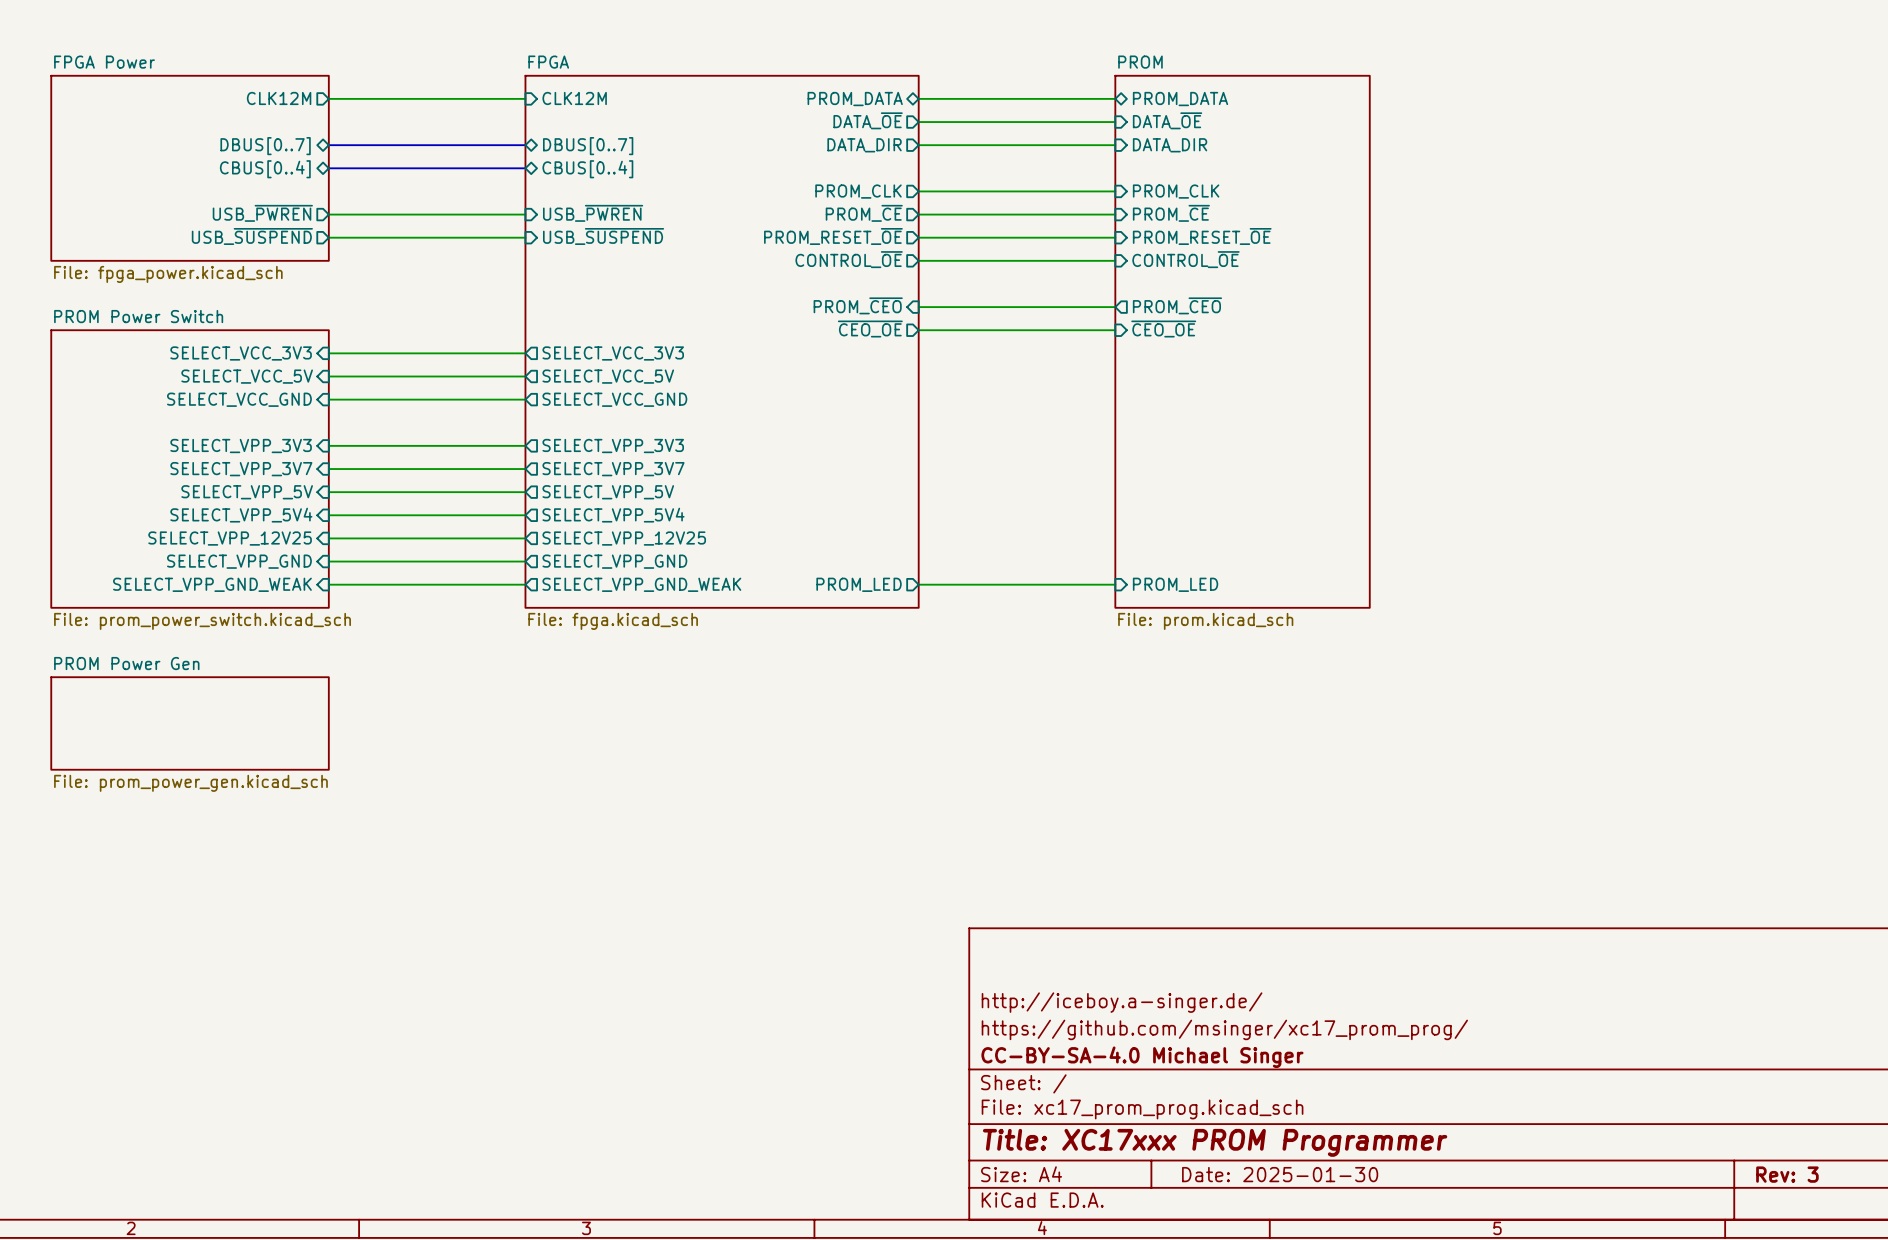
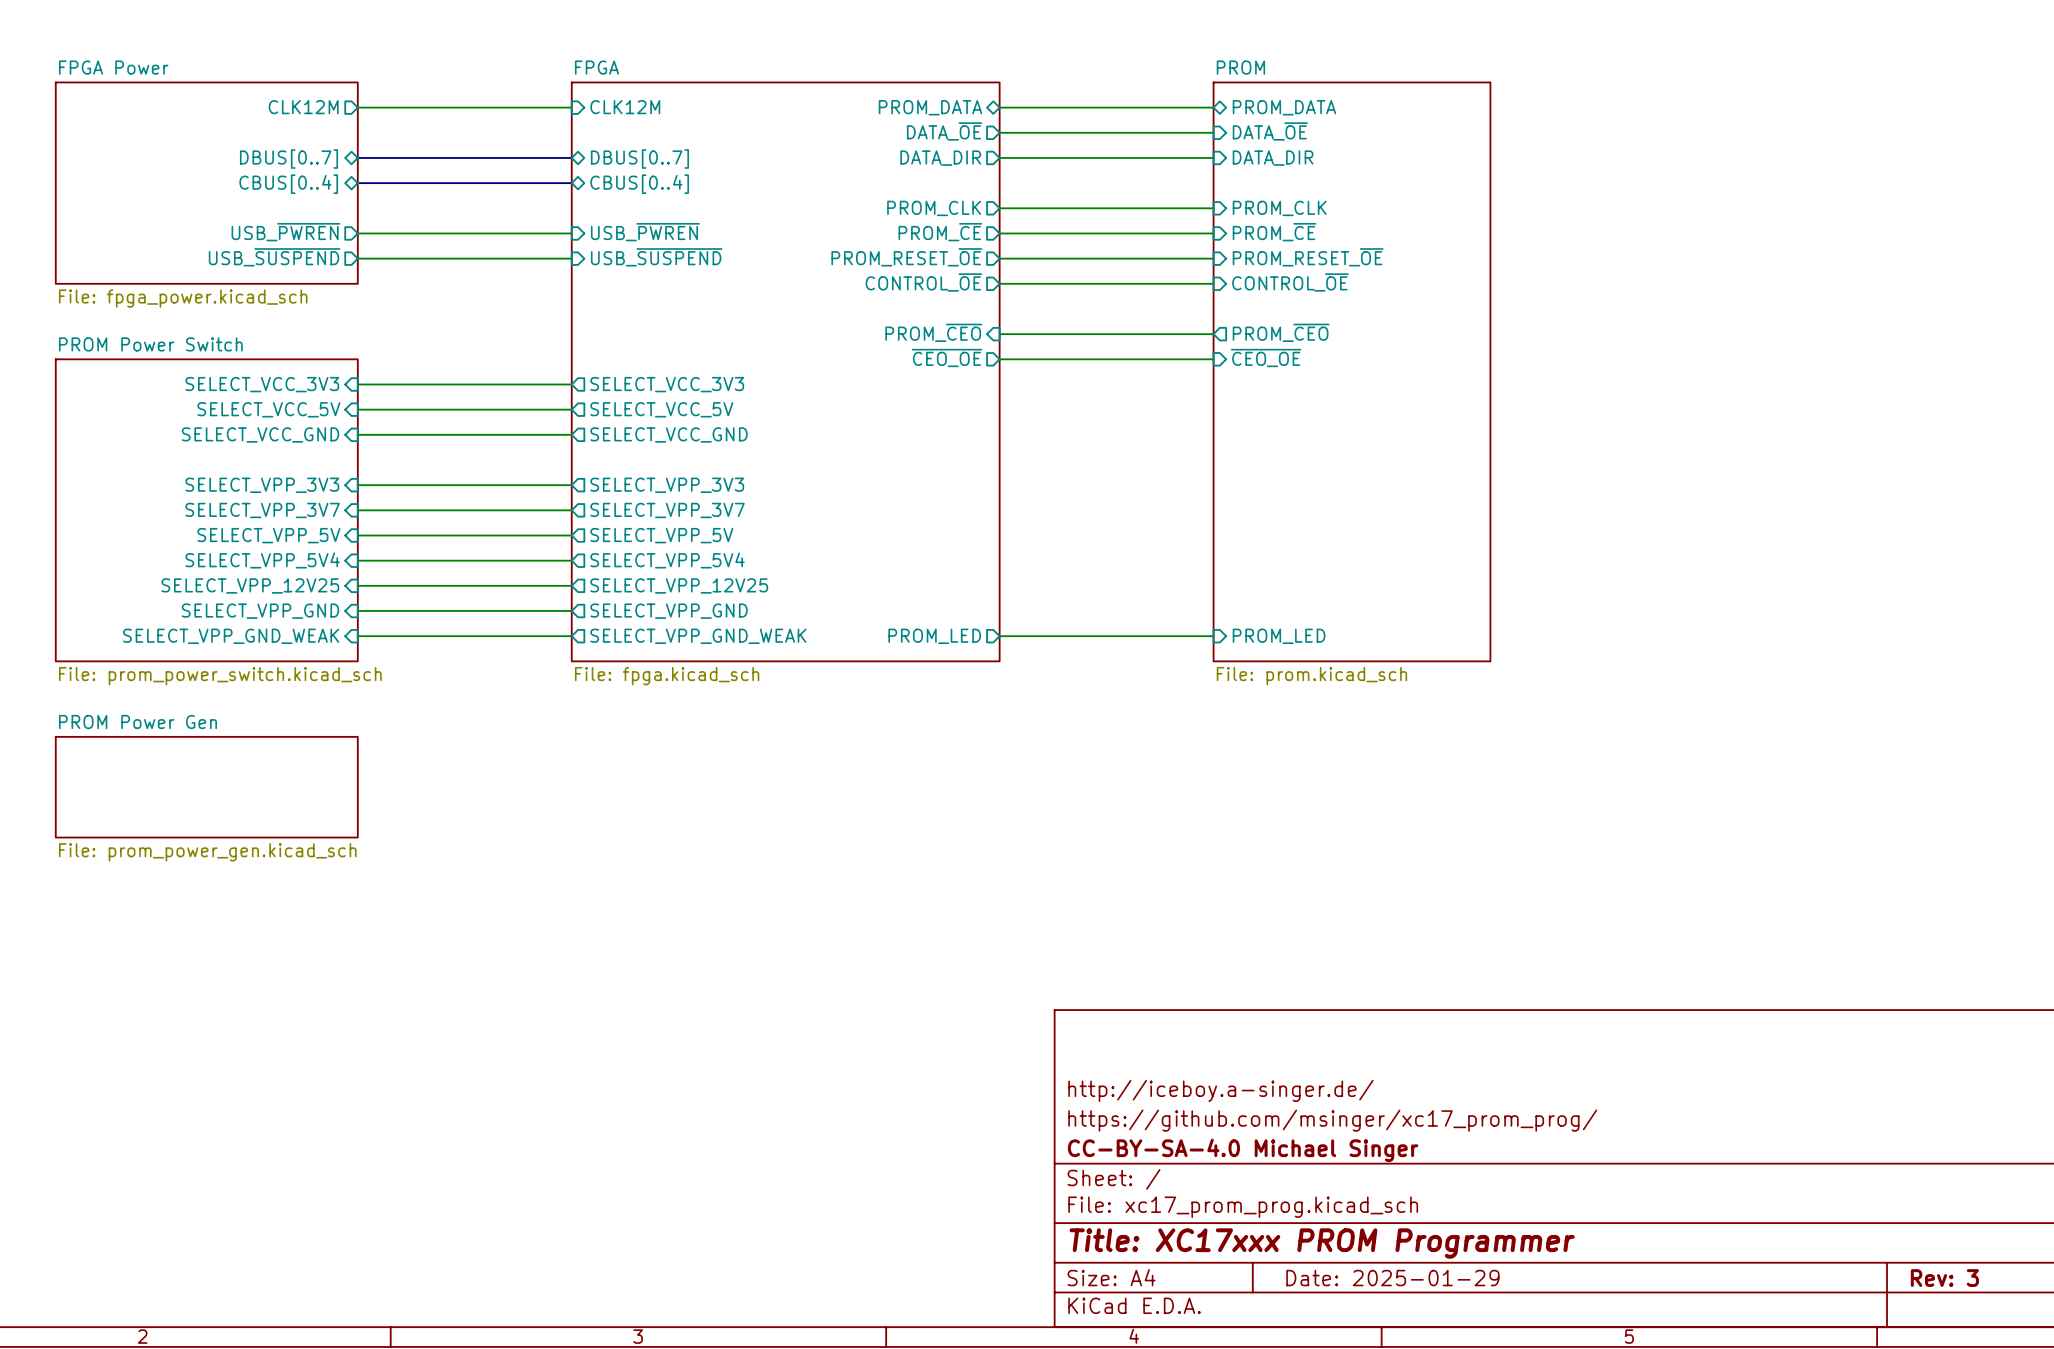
title block: Date: 2025-01-30 (1280, 1174) -> Date: 2025-01-29 (1392, 1278)

